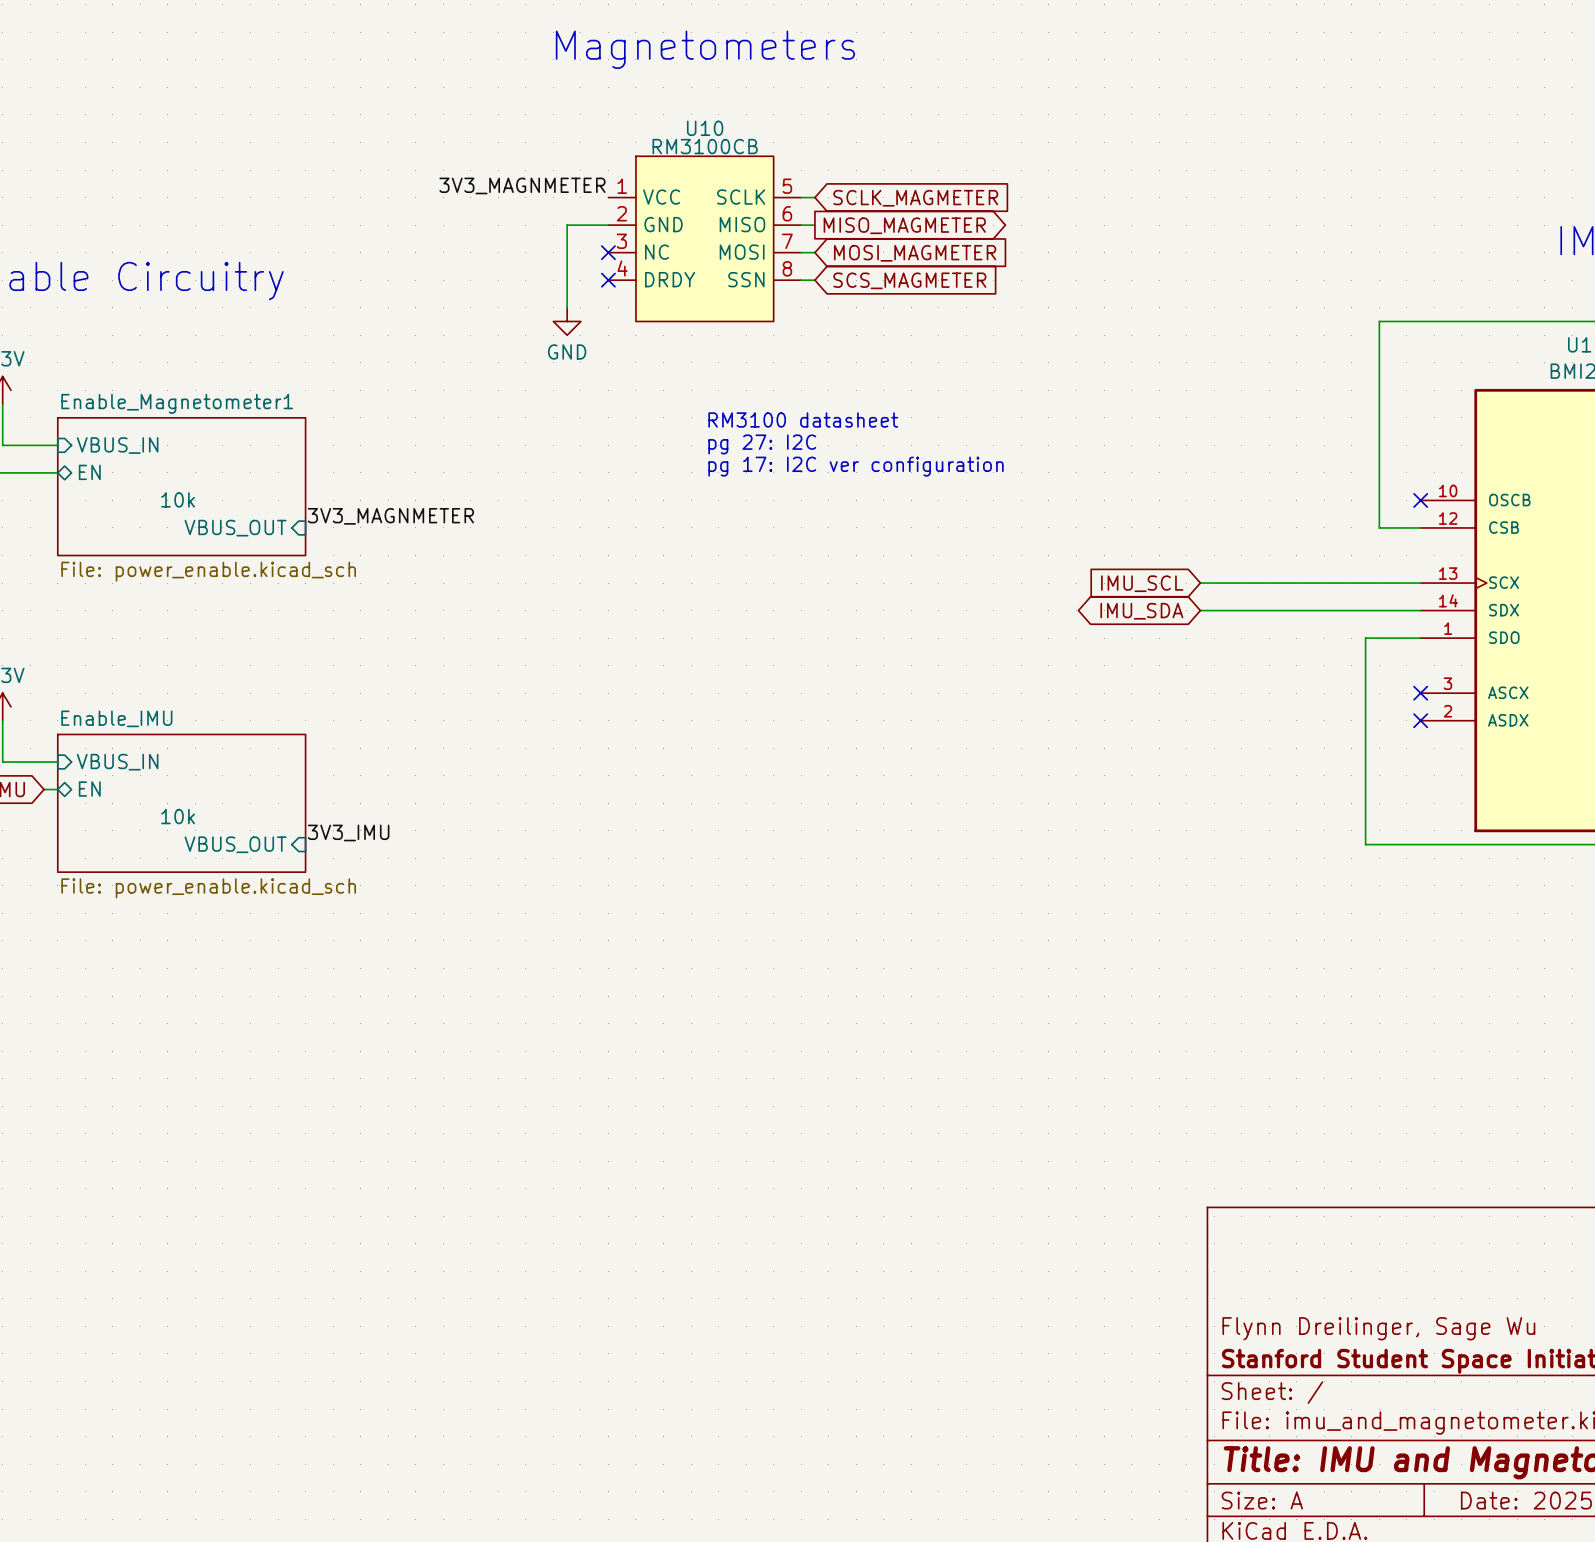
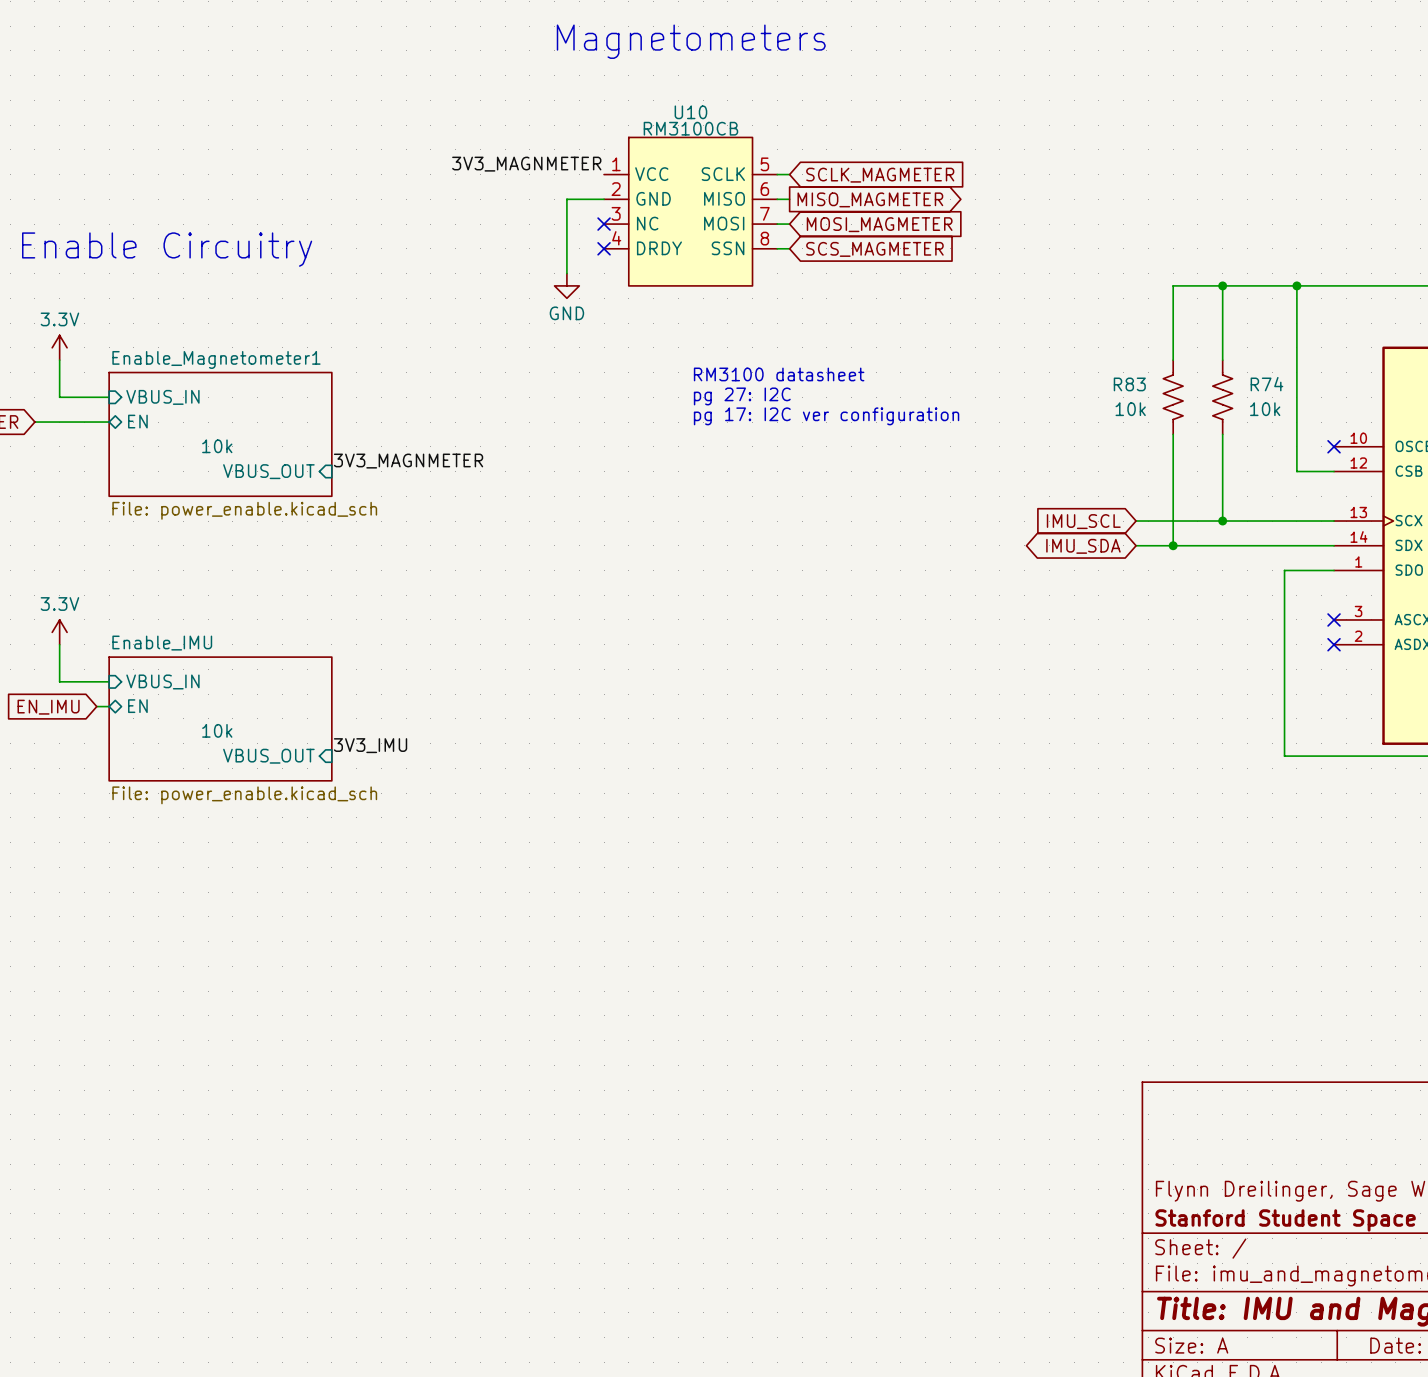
wire: none -> (1222, 285) (1222, 360)
junction: none -> (1222, 285)
wire: none -> (1296, 285) (1173, 285) (1173, 360)
junction: none -> (1296, 285)
R83: none -> 10k (1173, 397)
R74: none -> 10k (1222, 397)
wire: none -> (1173, 434) (1173, 545)
wire: none -> (1222, 434) (1222, 521)
junction: none -> (1222, 521)
junction: none -> (1173, 545)

